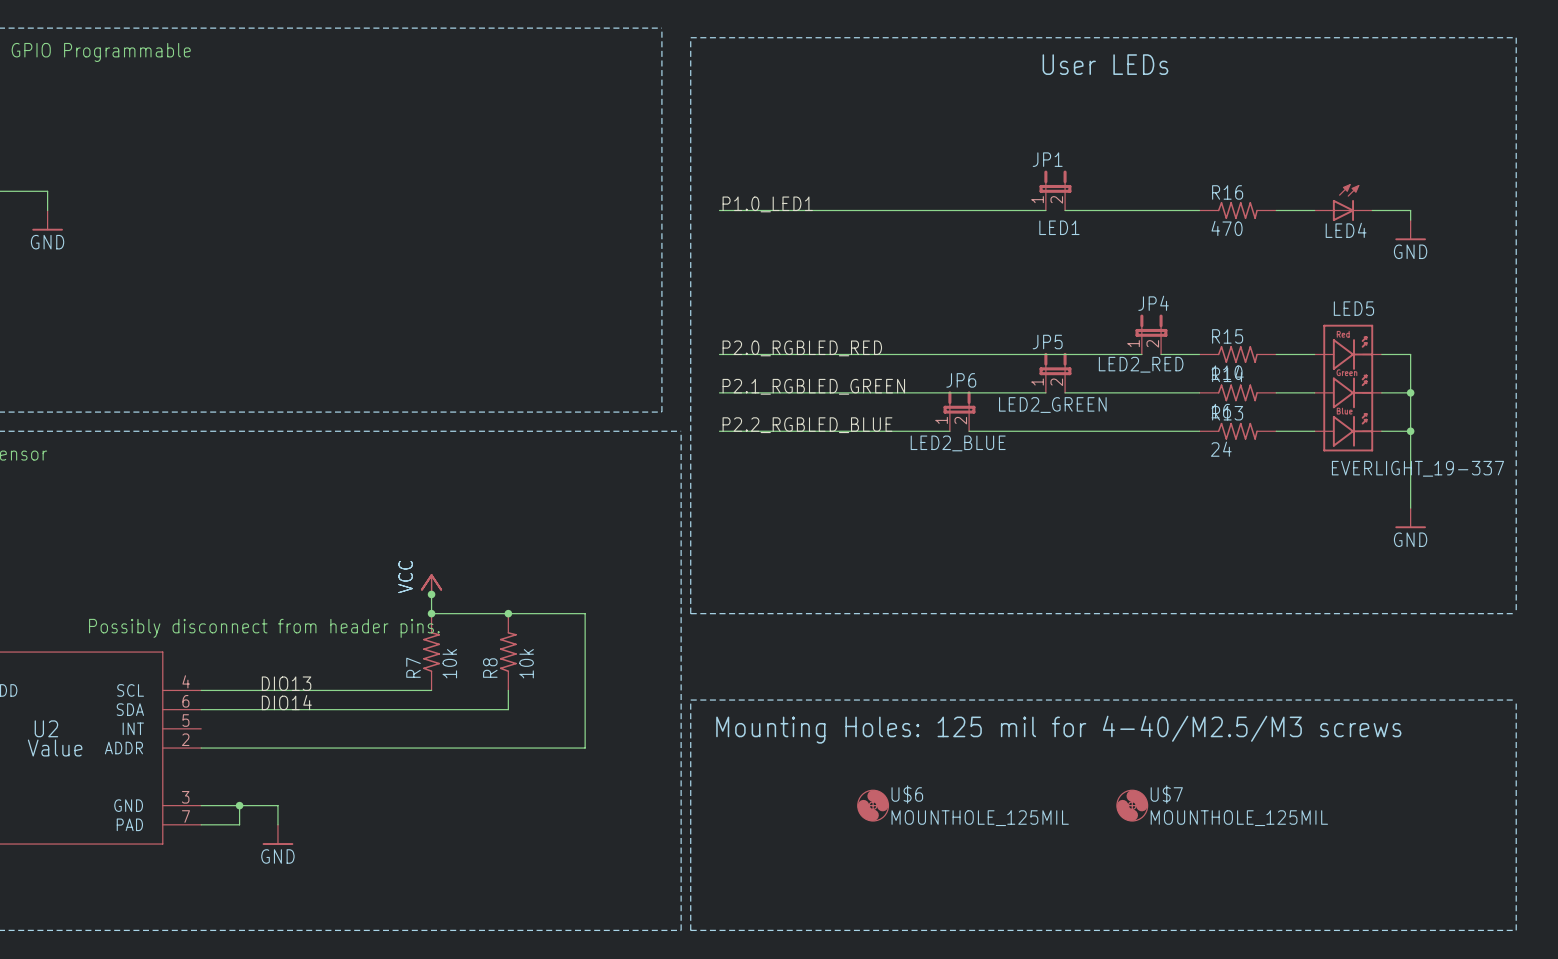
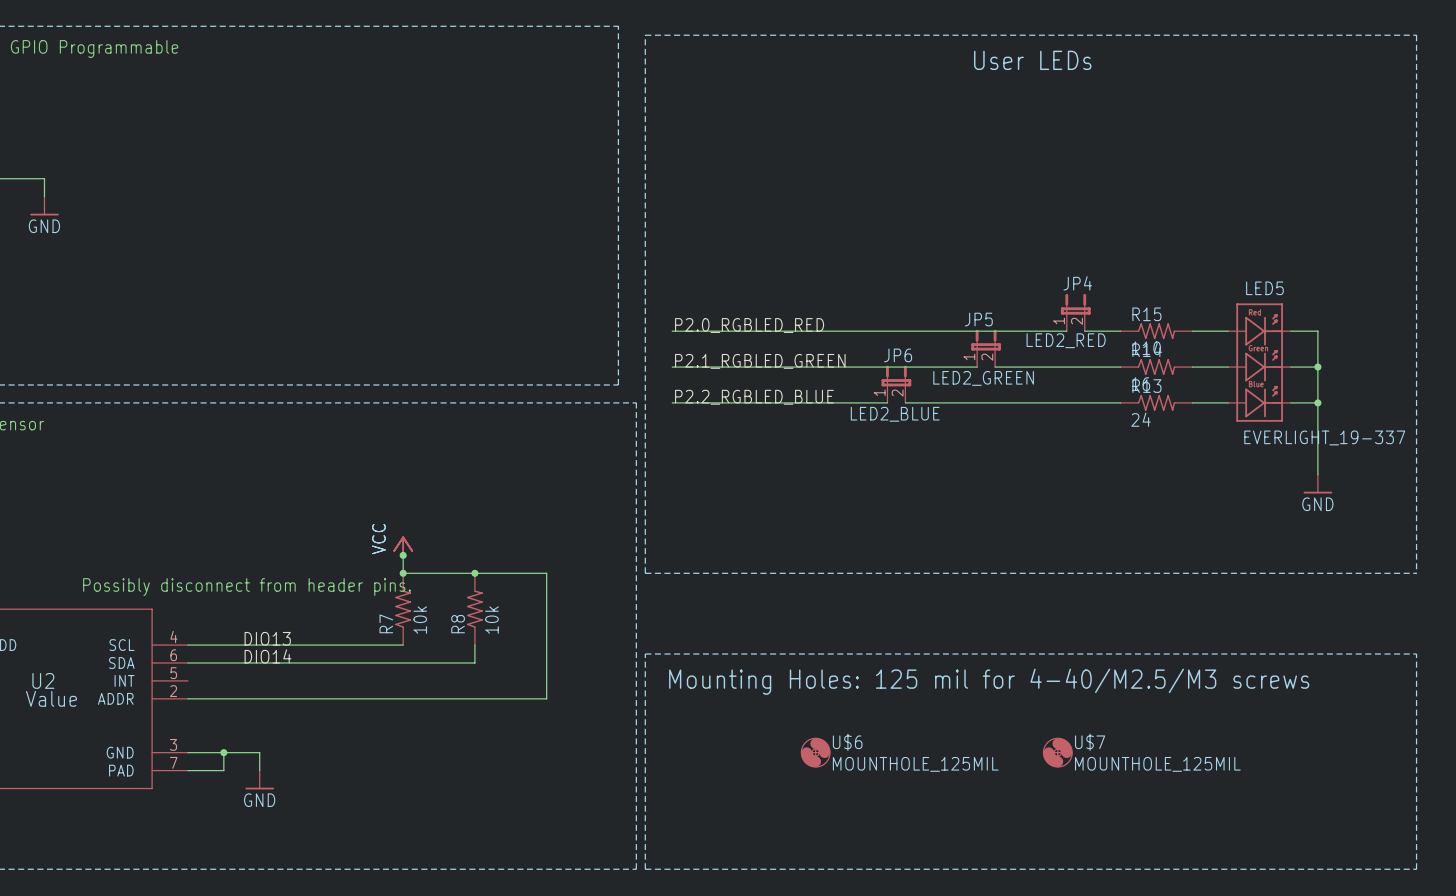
JP1: LED1 (1055, 190) -> none
LED4: (1343, 202) -> none
label: P1.0_LED1 (767, 204) -> none
wire: (719, 210) (1045, 210) -> none
wire: (1065, 210) (1199, 210) -> none
R16: 470 (1237, 210) -> none
wire: (1276, 210) (1314, 210) -> none
wire: (1372, 210) (1410, 210) (1410, 220) -> none
power symbol: GND (1410, 230) -> none

